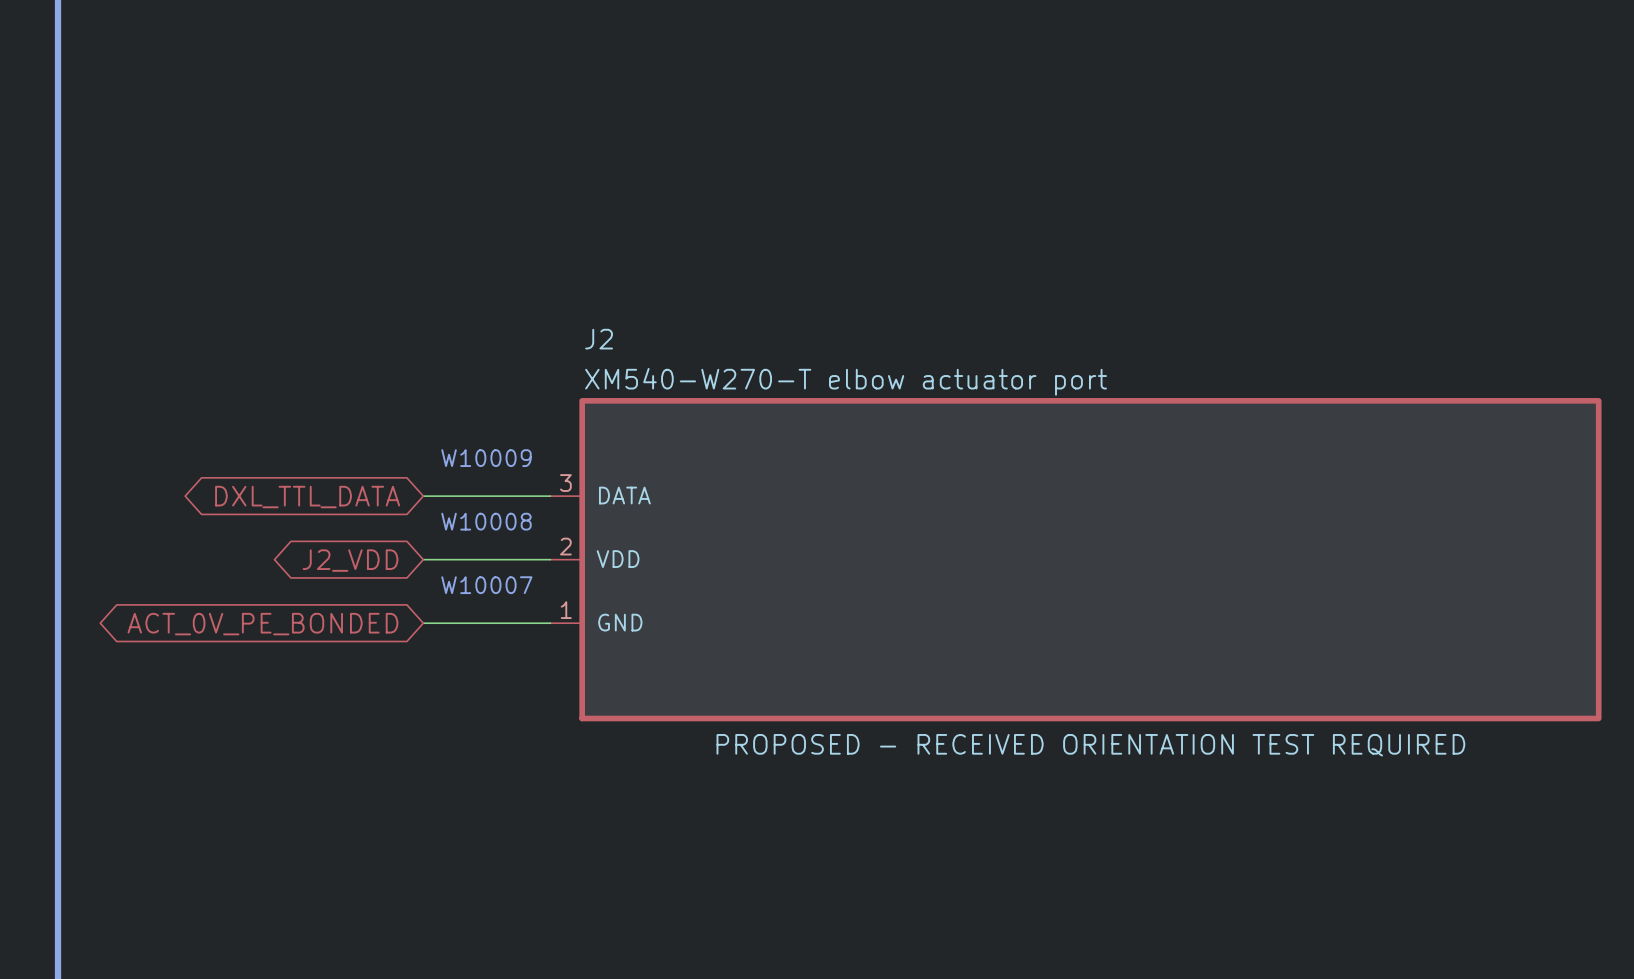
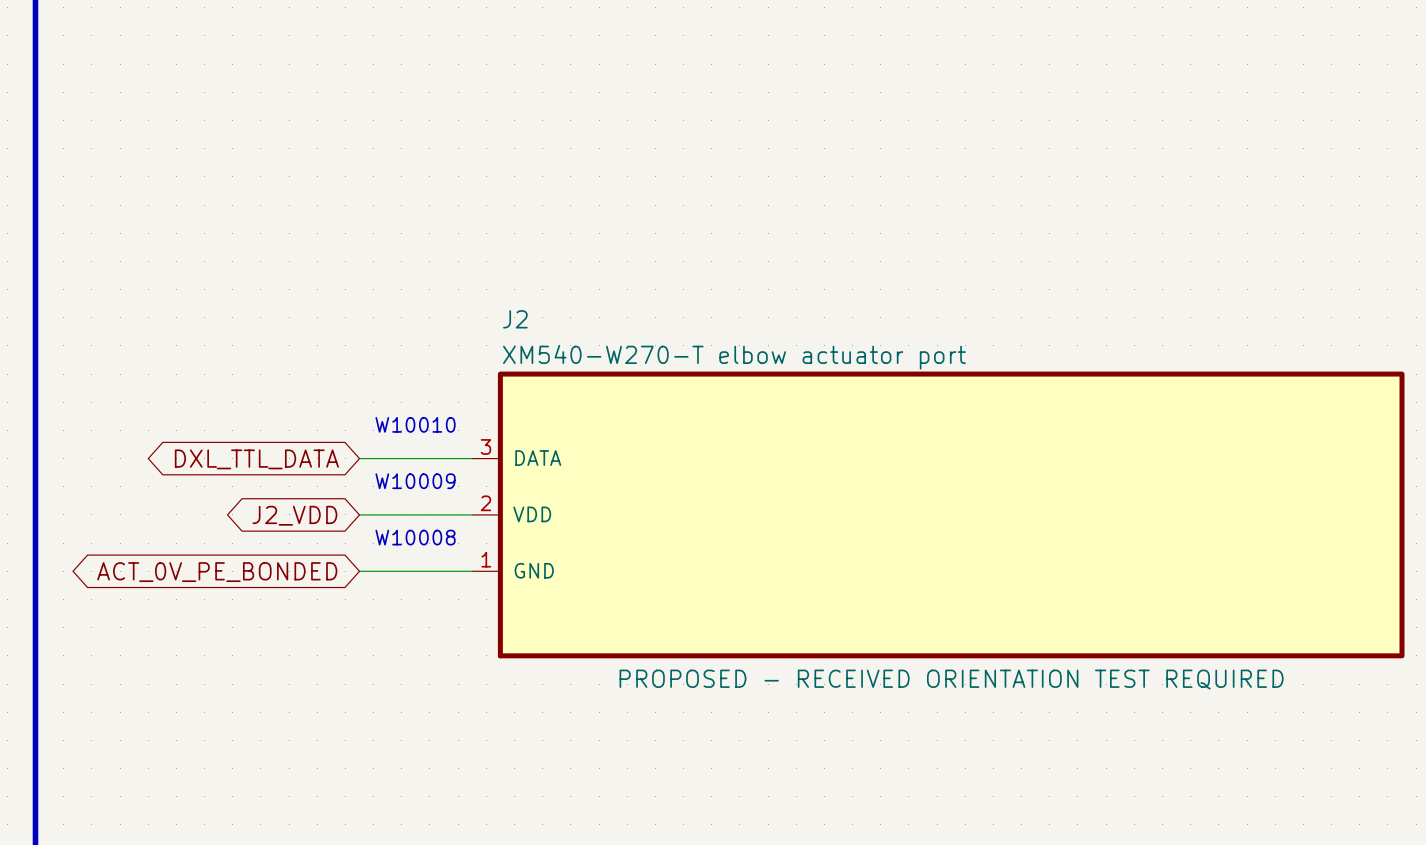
text: W10009 (486, 458) -> W10010 (415, 424)
text: W10008 (486, 521) -> W10009 (415, 481)
text: W10007 (486, 585) -> W10008 (415, 537)

